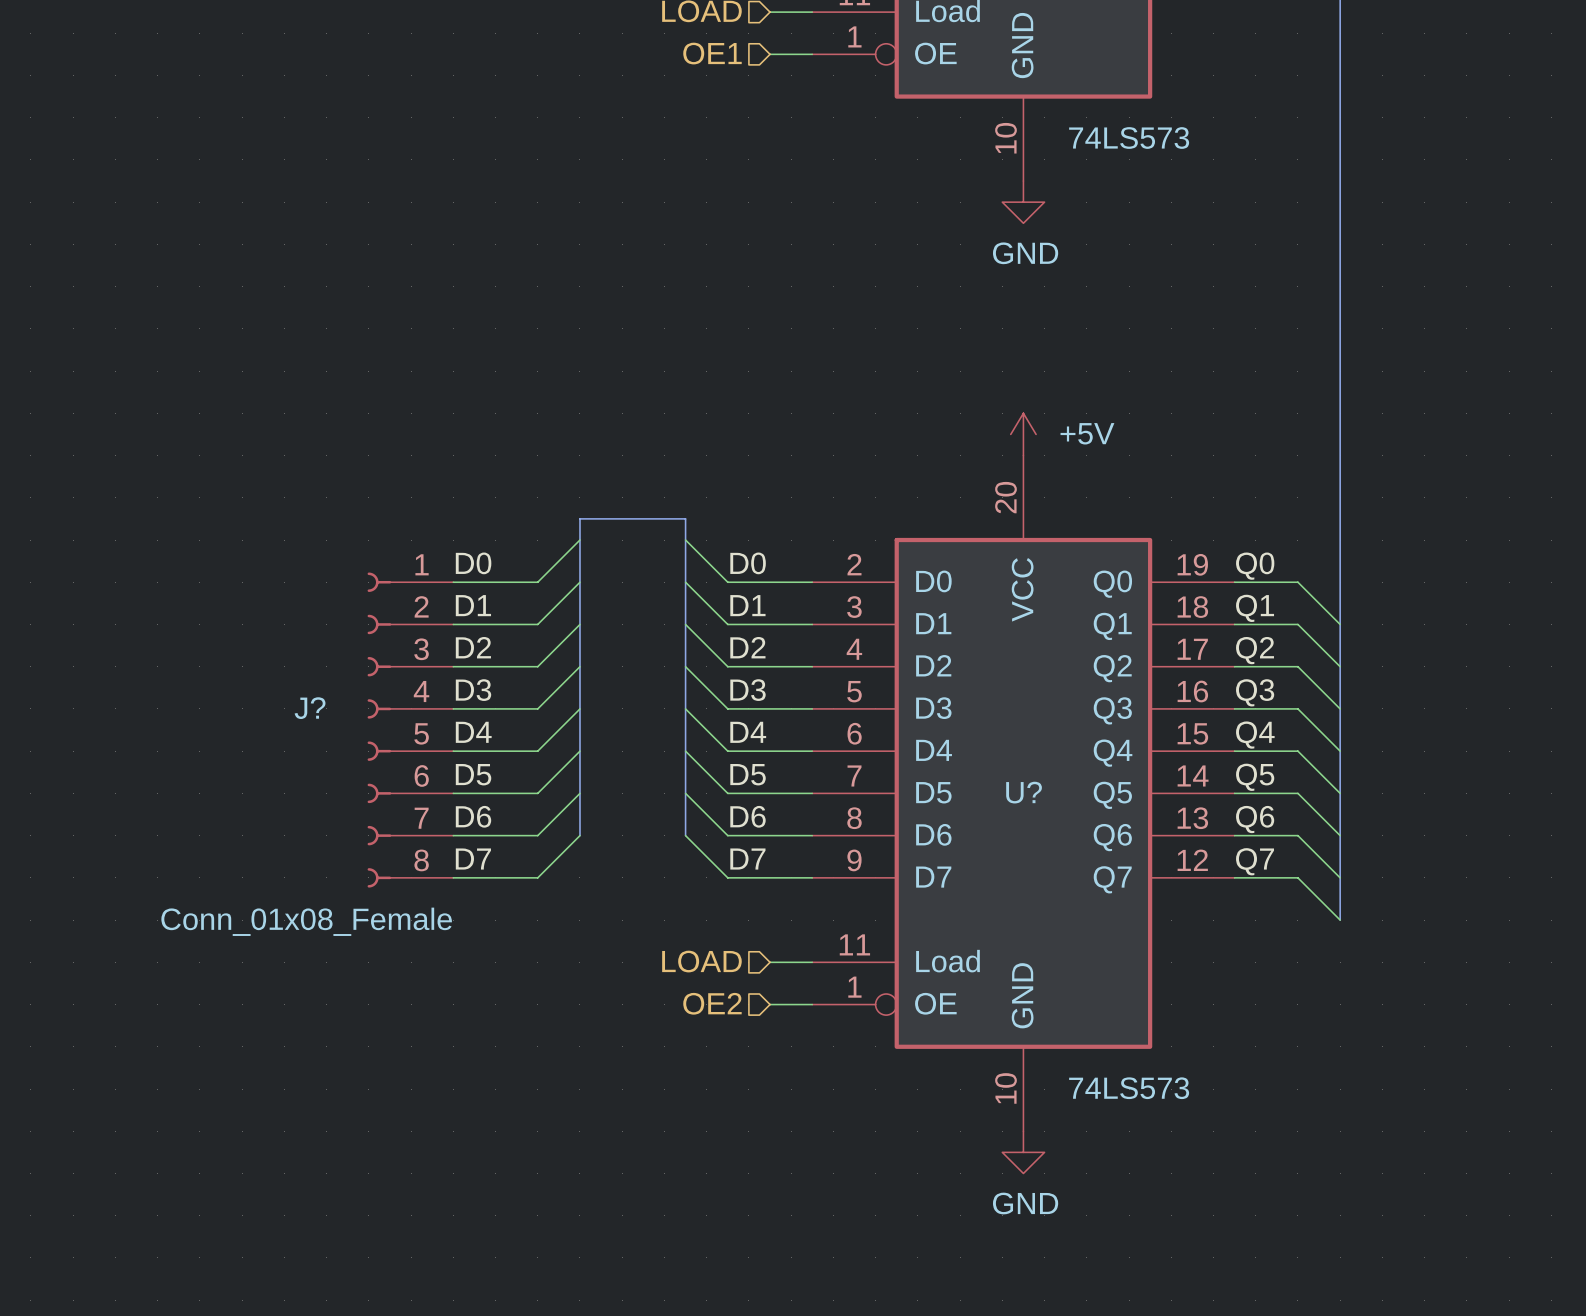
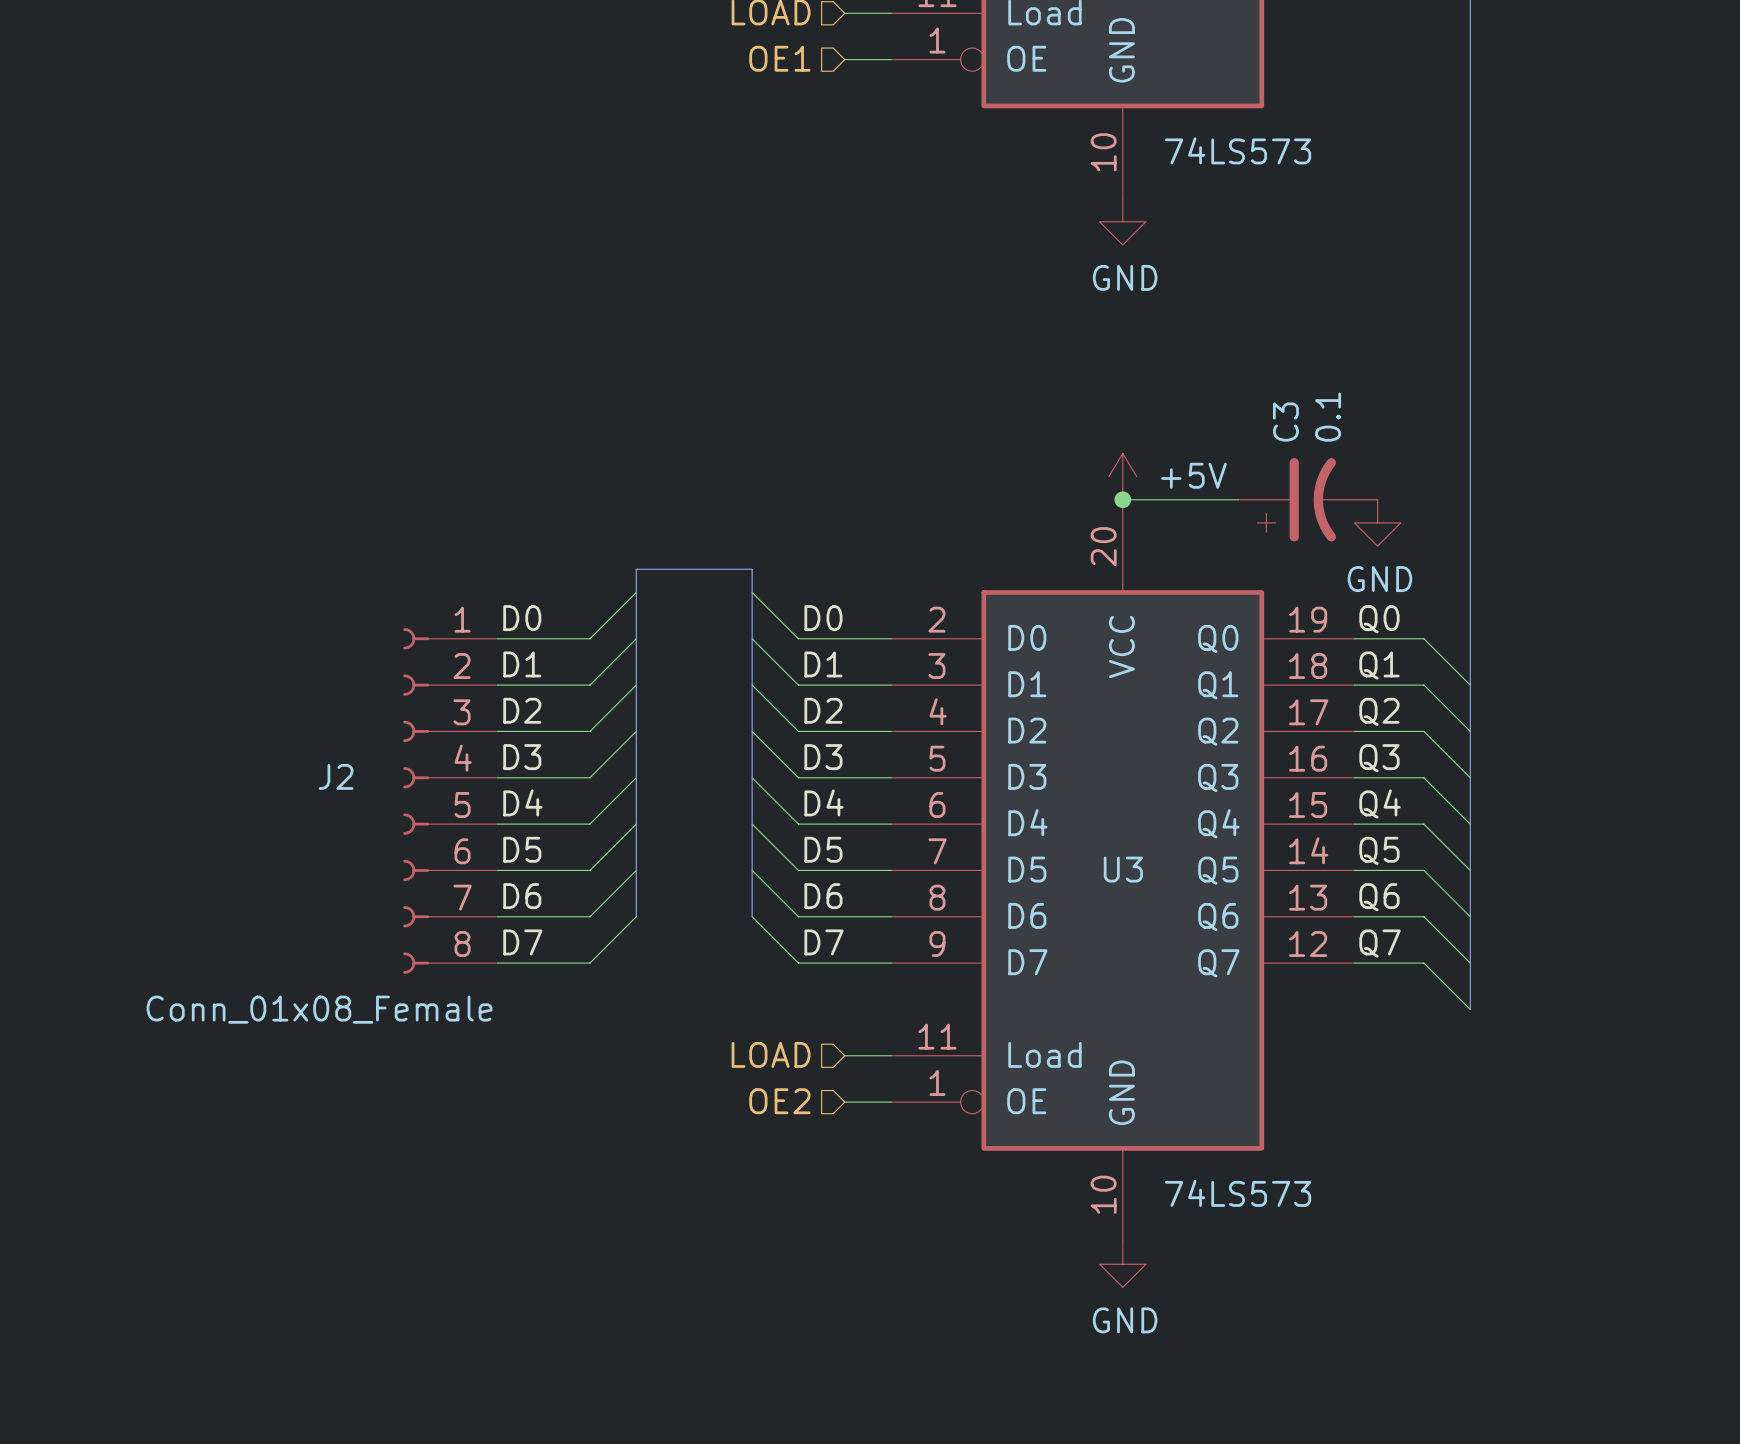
wire: none -> (1122, 499) (1238, 499)
junction: none -> (1122, 499)
C3: none -> 0.1 (1308, 499)
power symbol: none -> GND (1377, 522)
J? name: J? (310, 708) -> J2 (336, 776)
U? name: U? (1024, 792) -> U3 (1123, 869)

